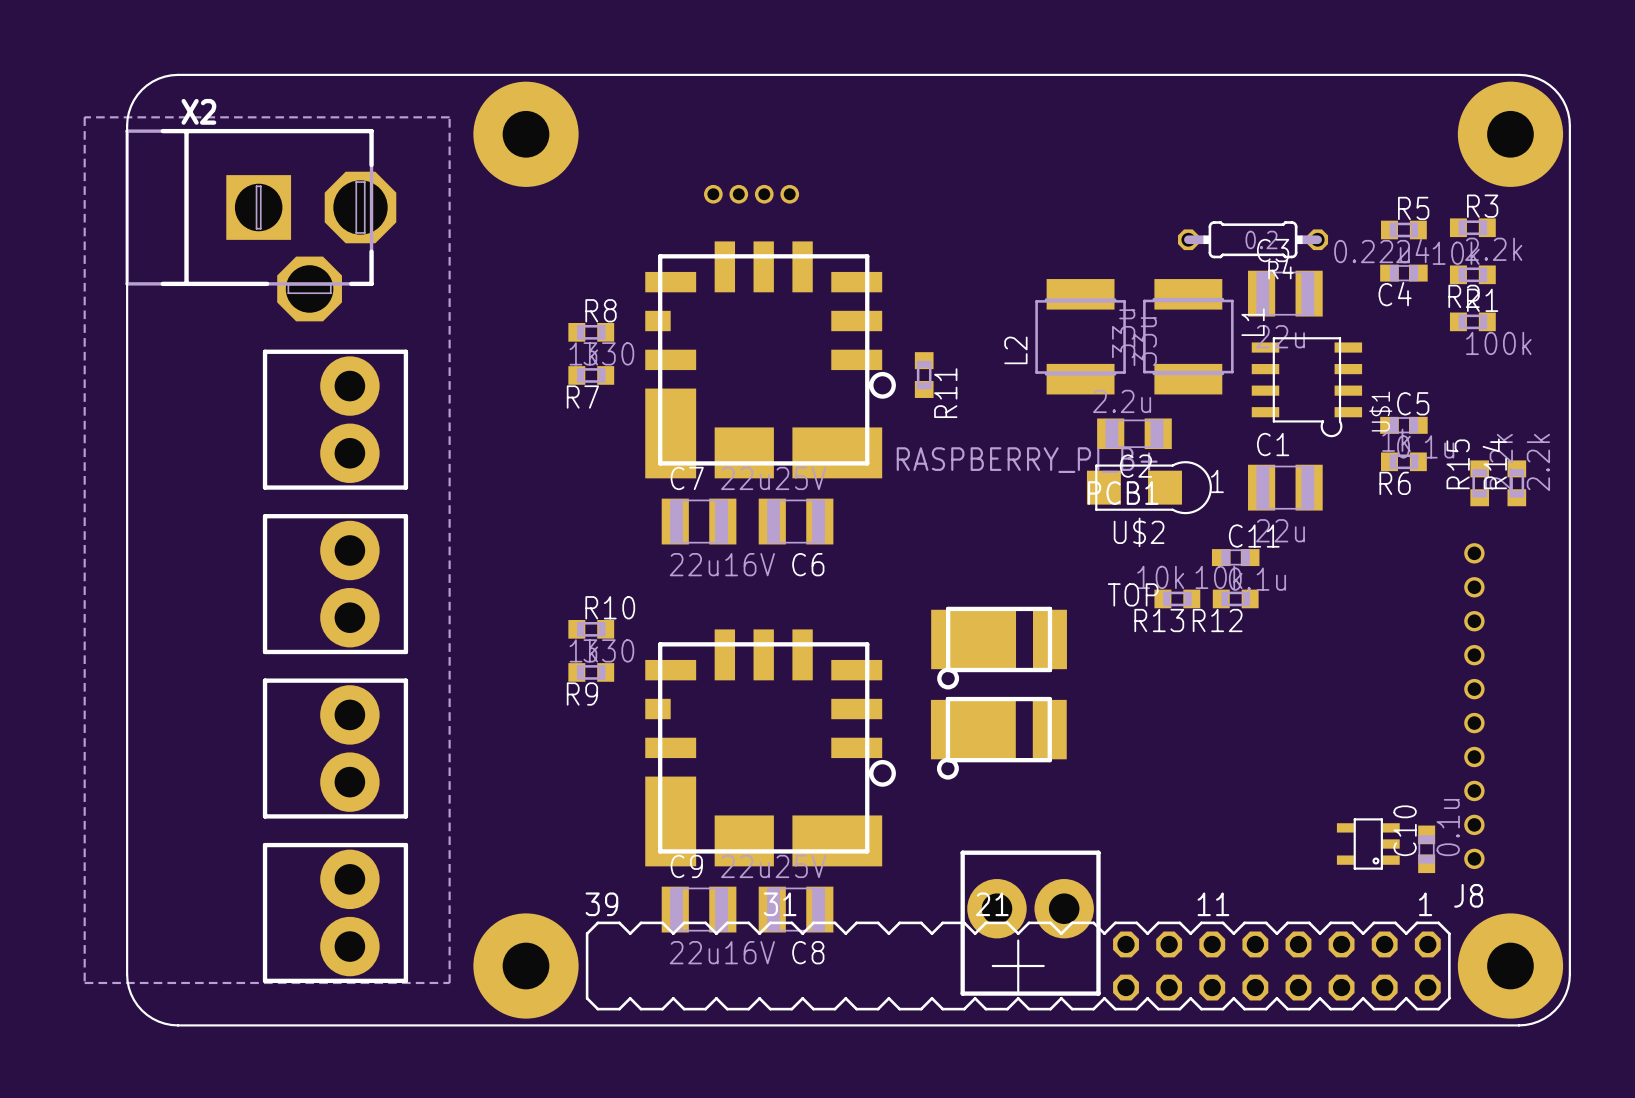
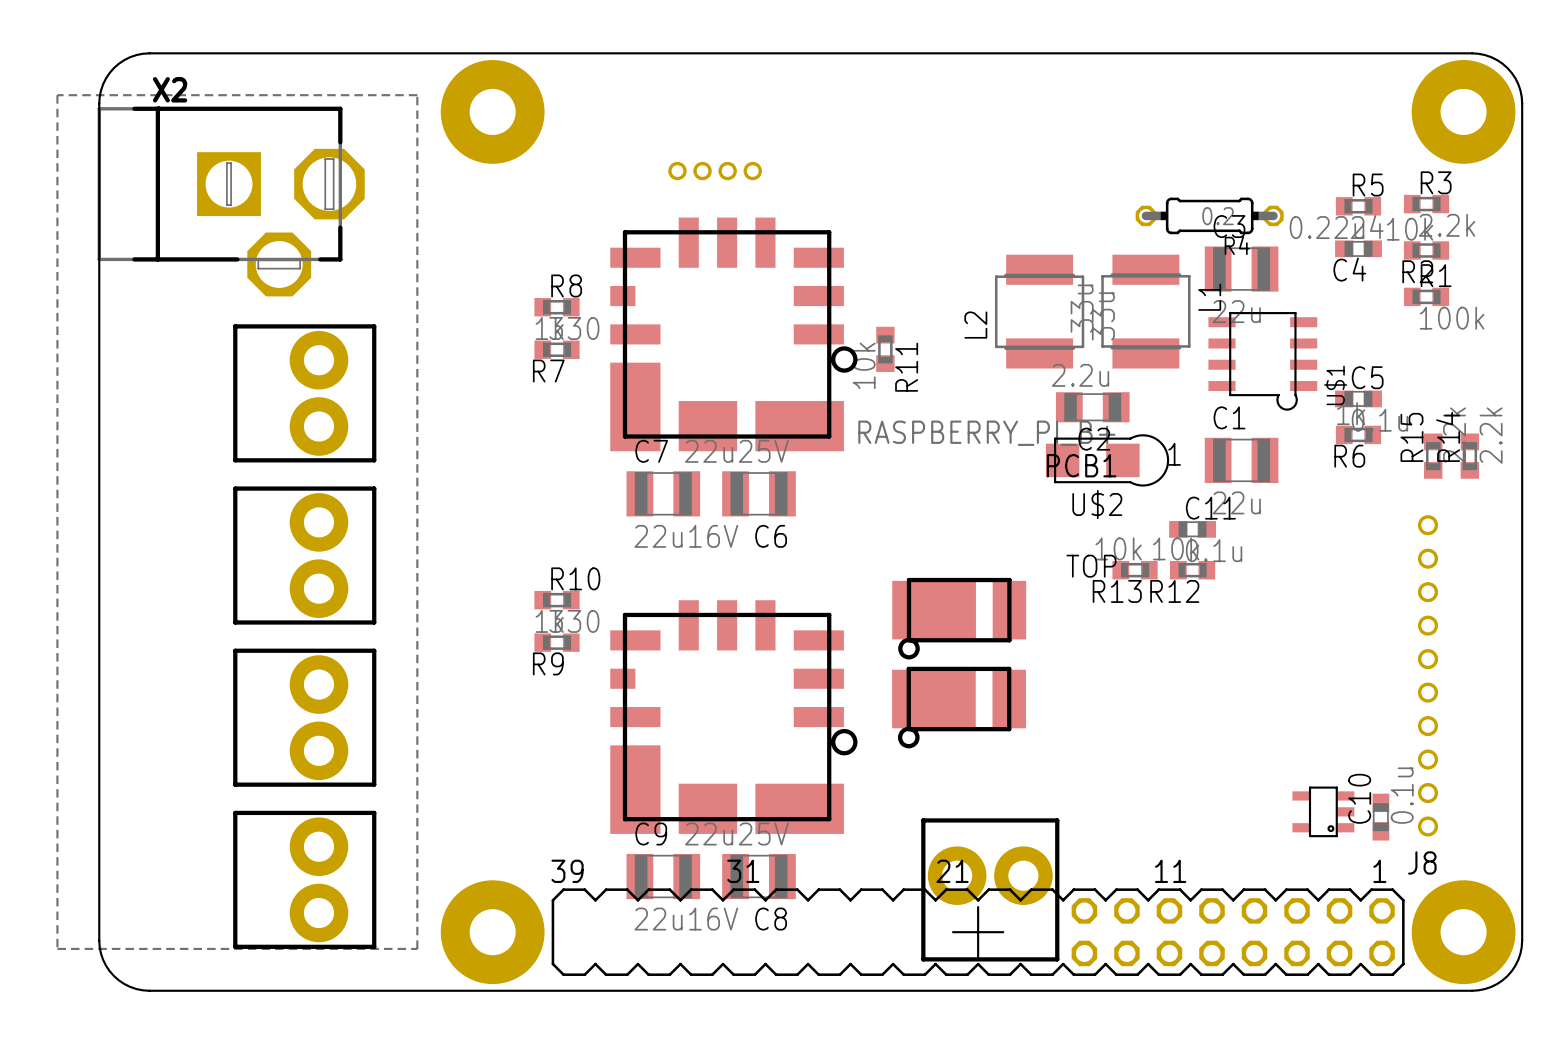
R11 value: none -> 10k (864, 365)

